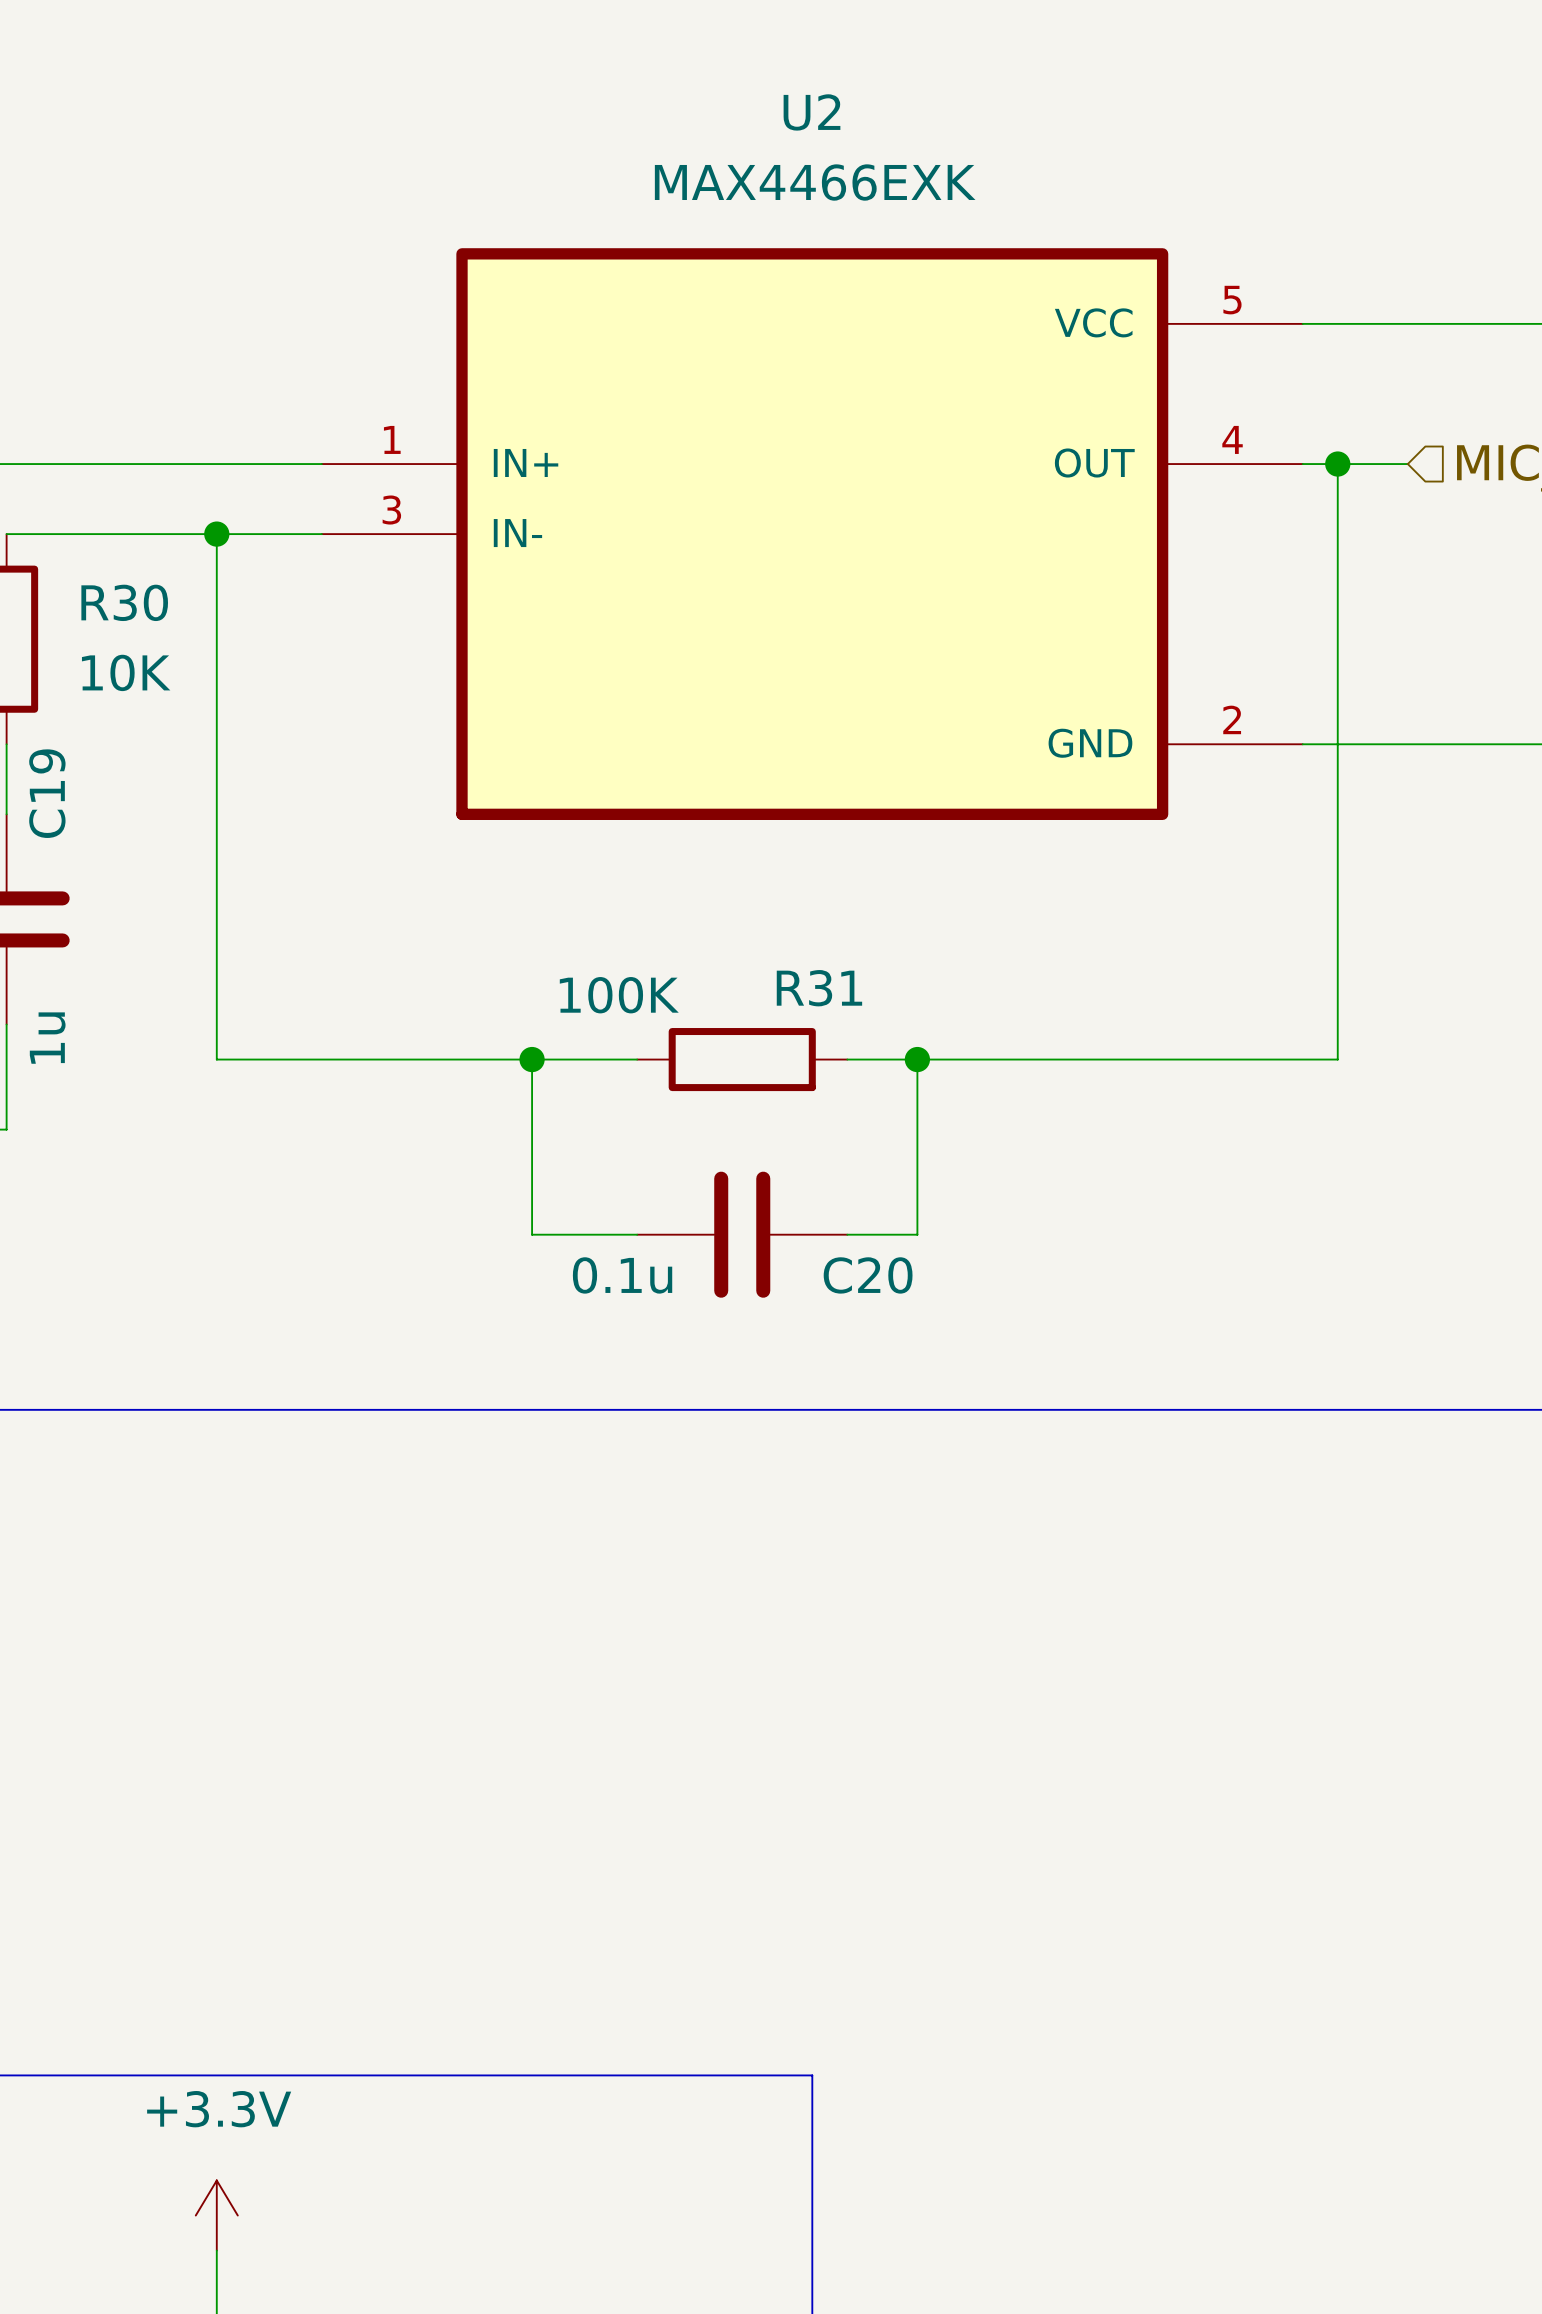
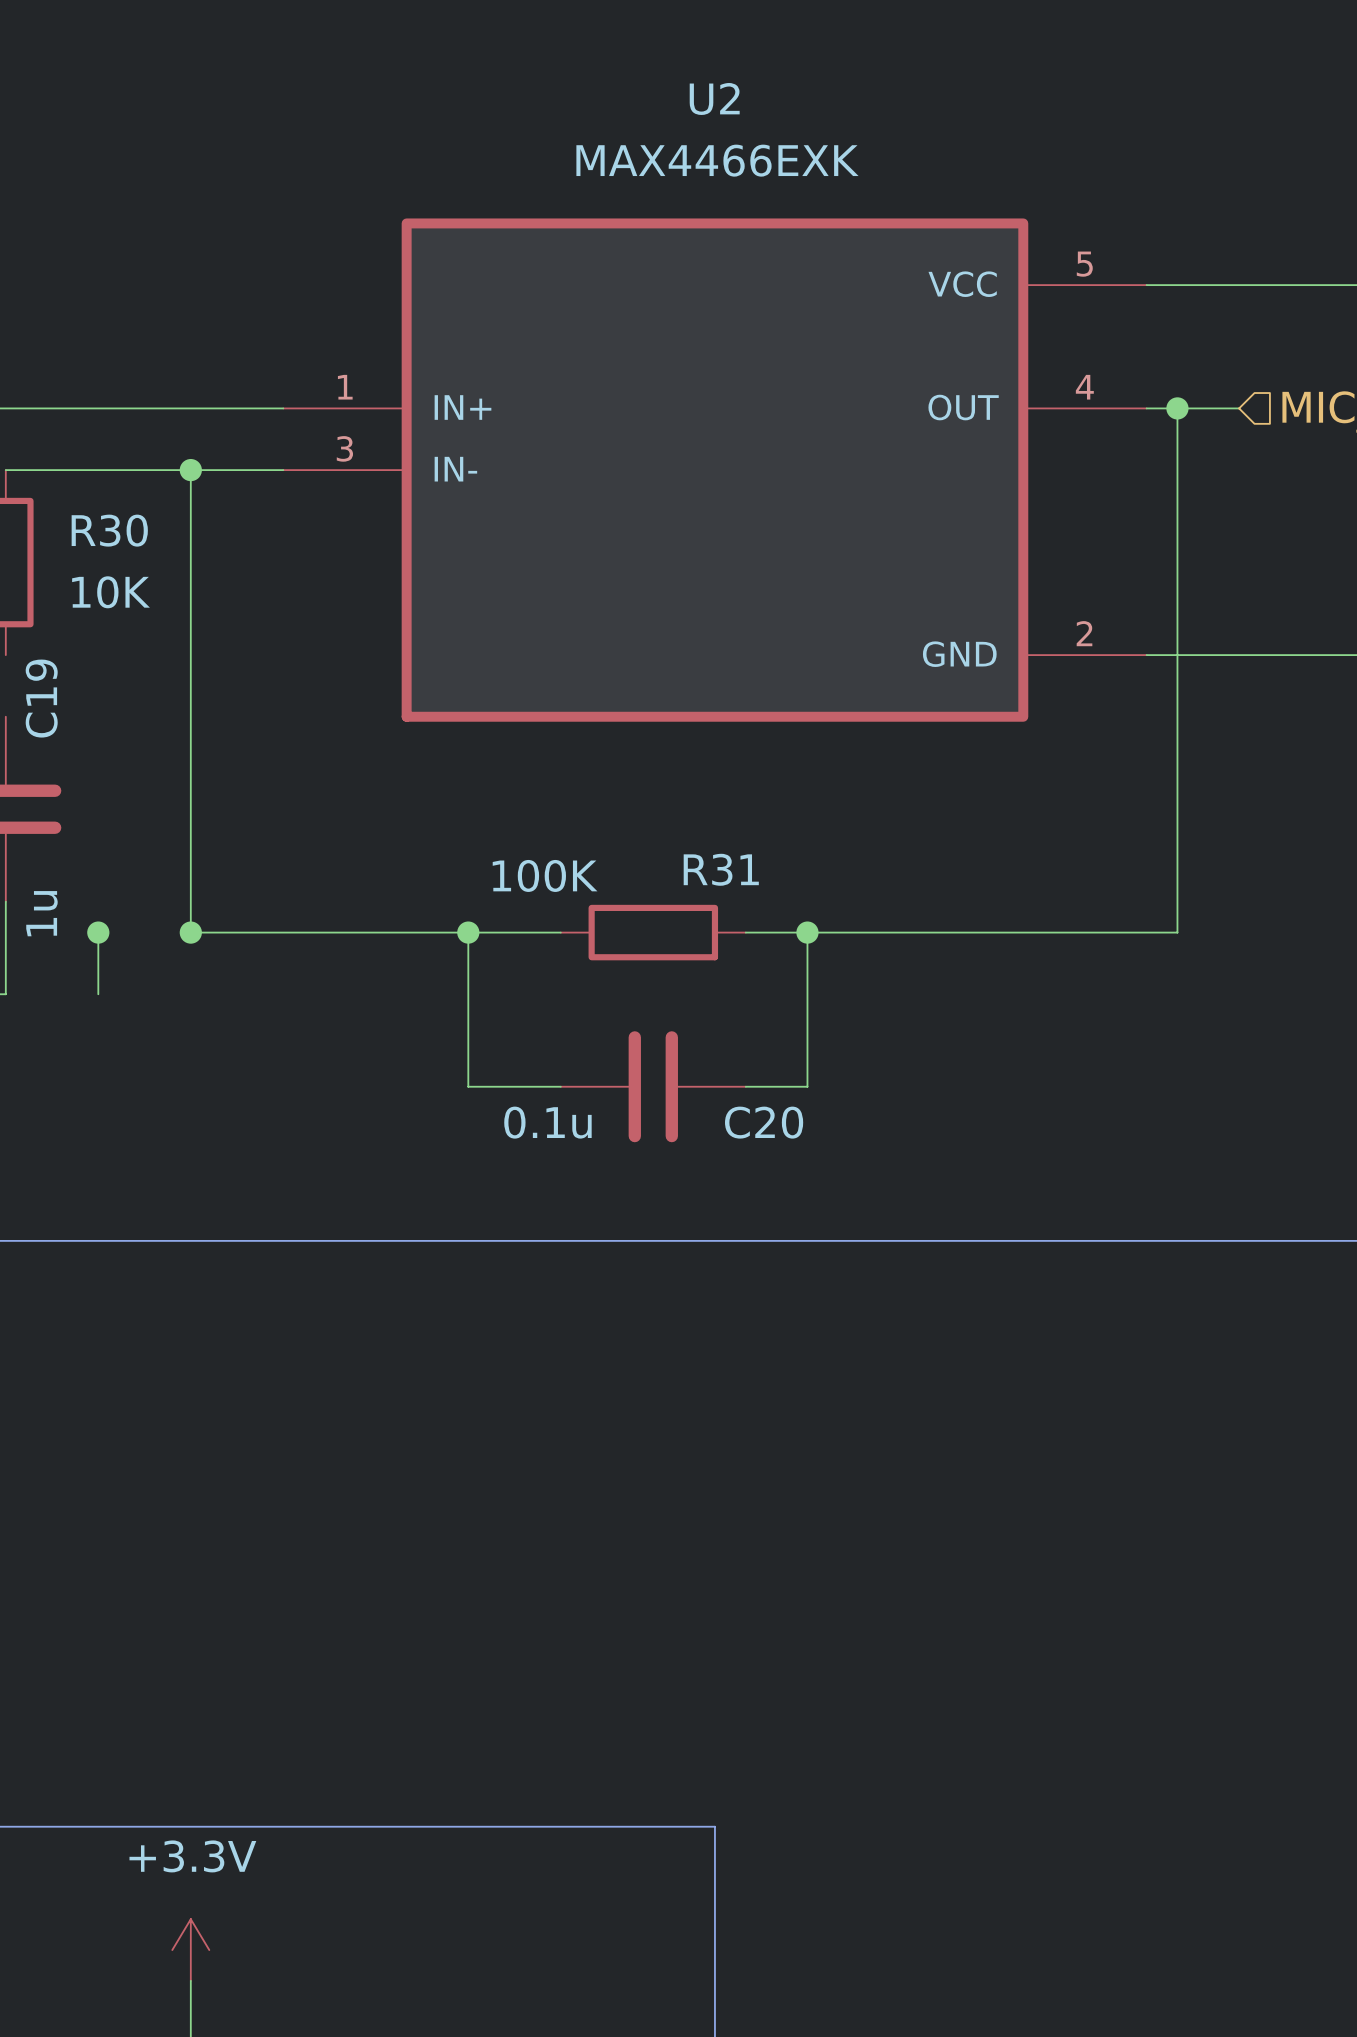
wire: (6, 744) (6, 814) -> (98, 932) (98, 994)
junction: none -> (98, 932)
junction: none -> (190, 932)

